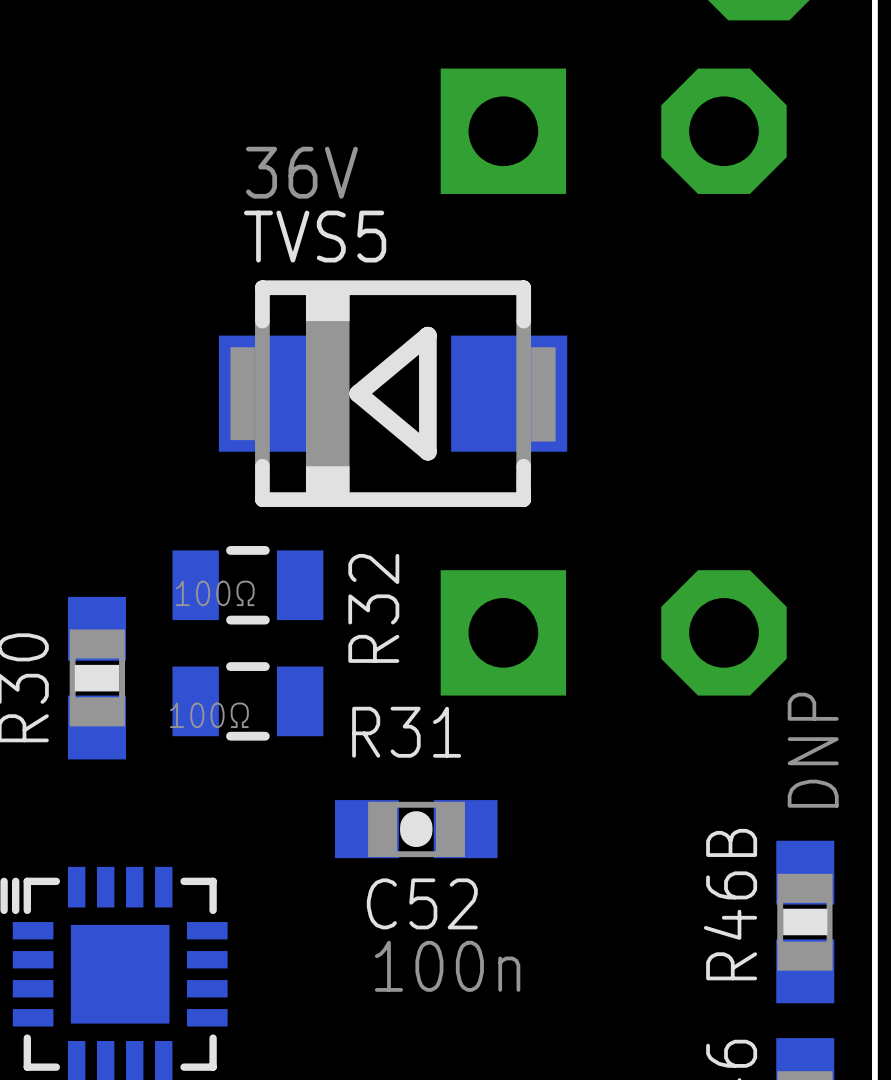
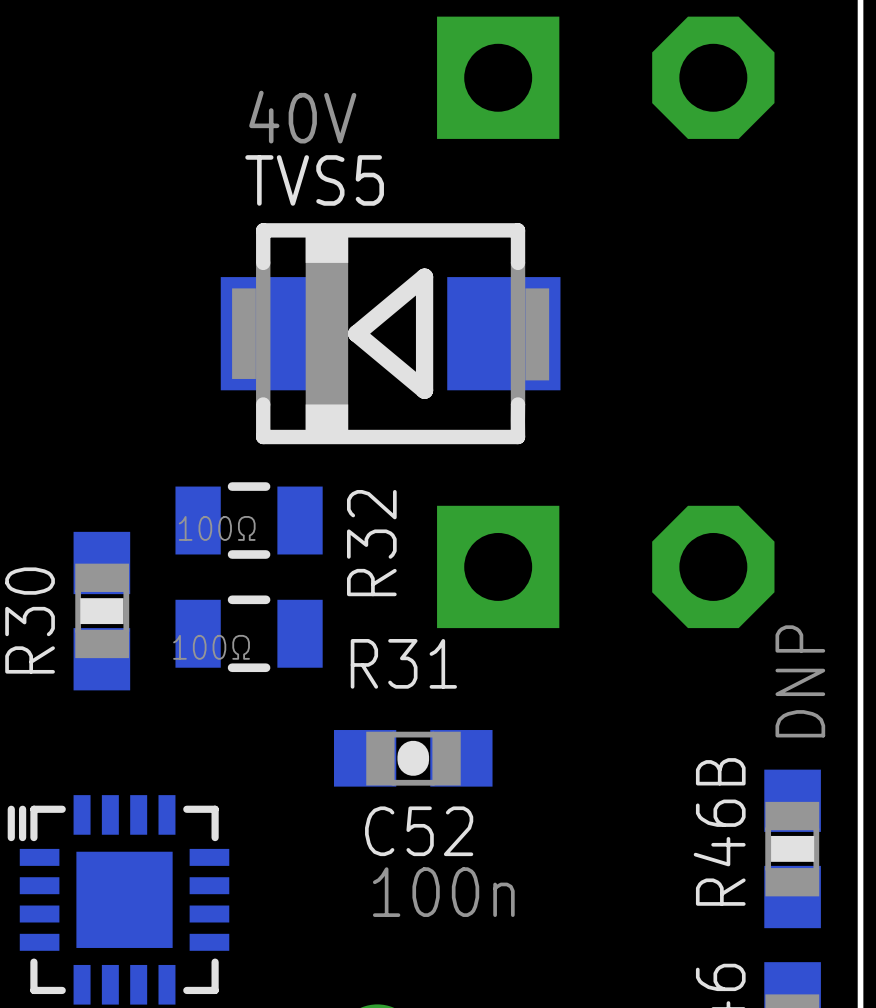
TVS5 value: 36V (301, 172) -> 40V (302, 117)

